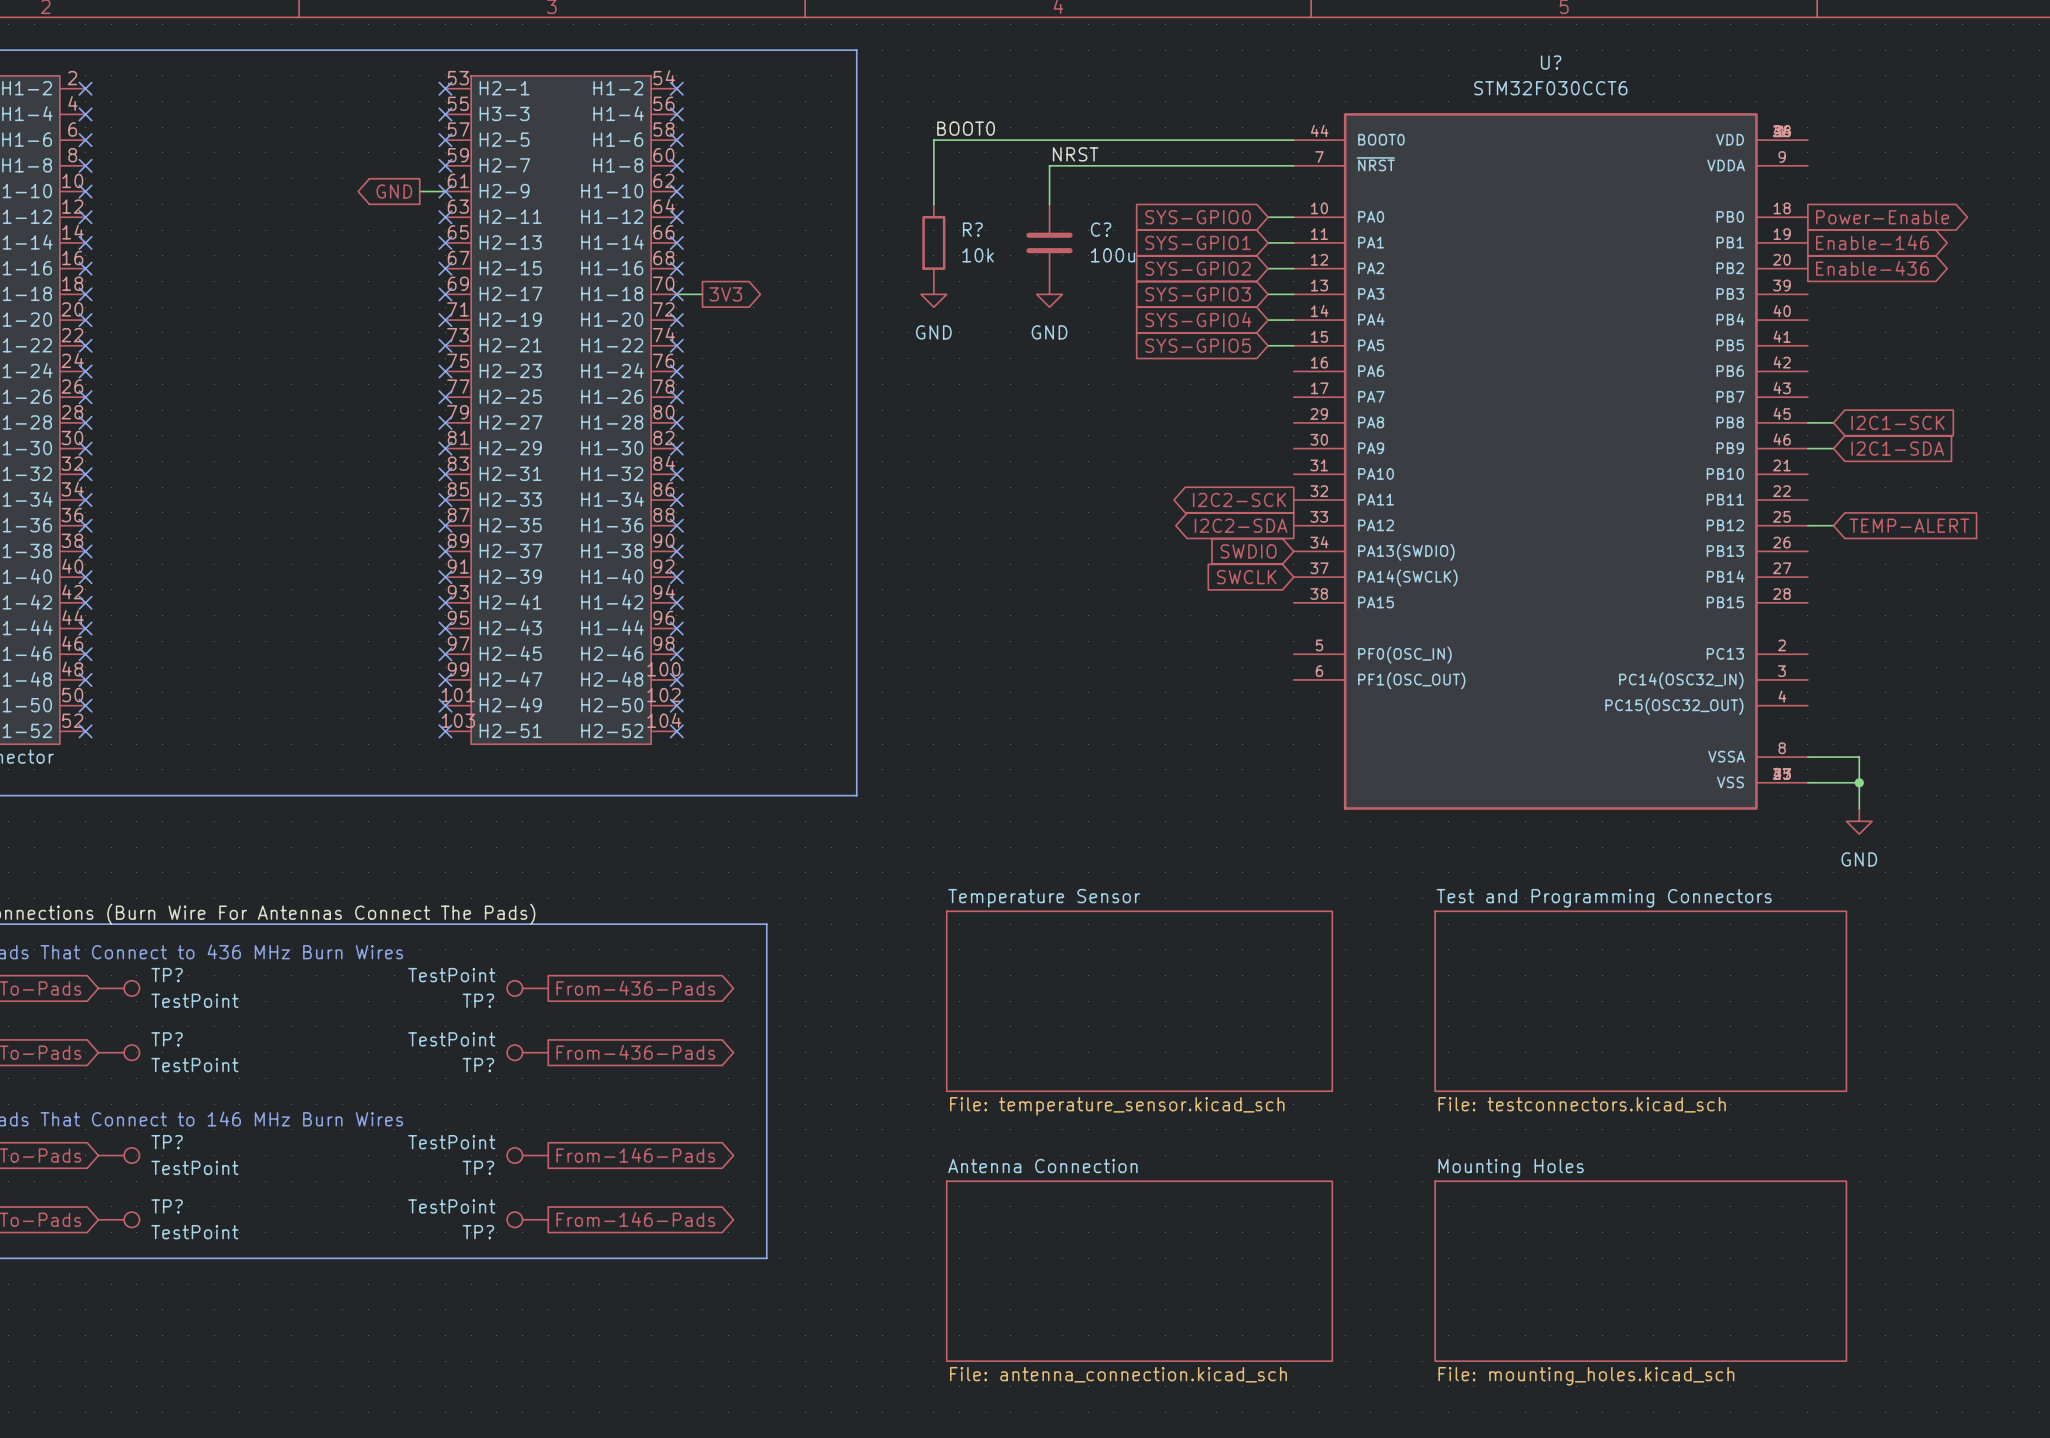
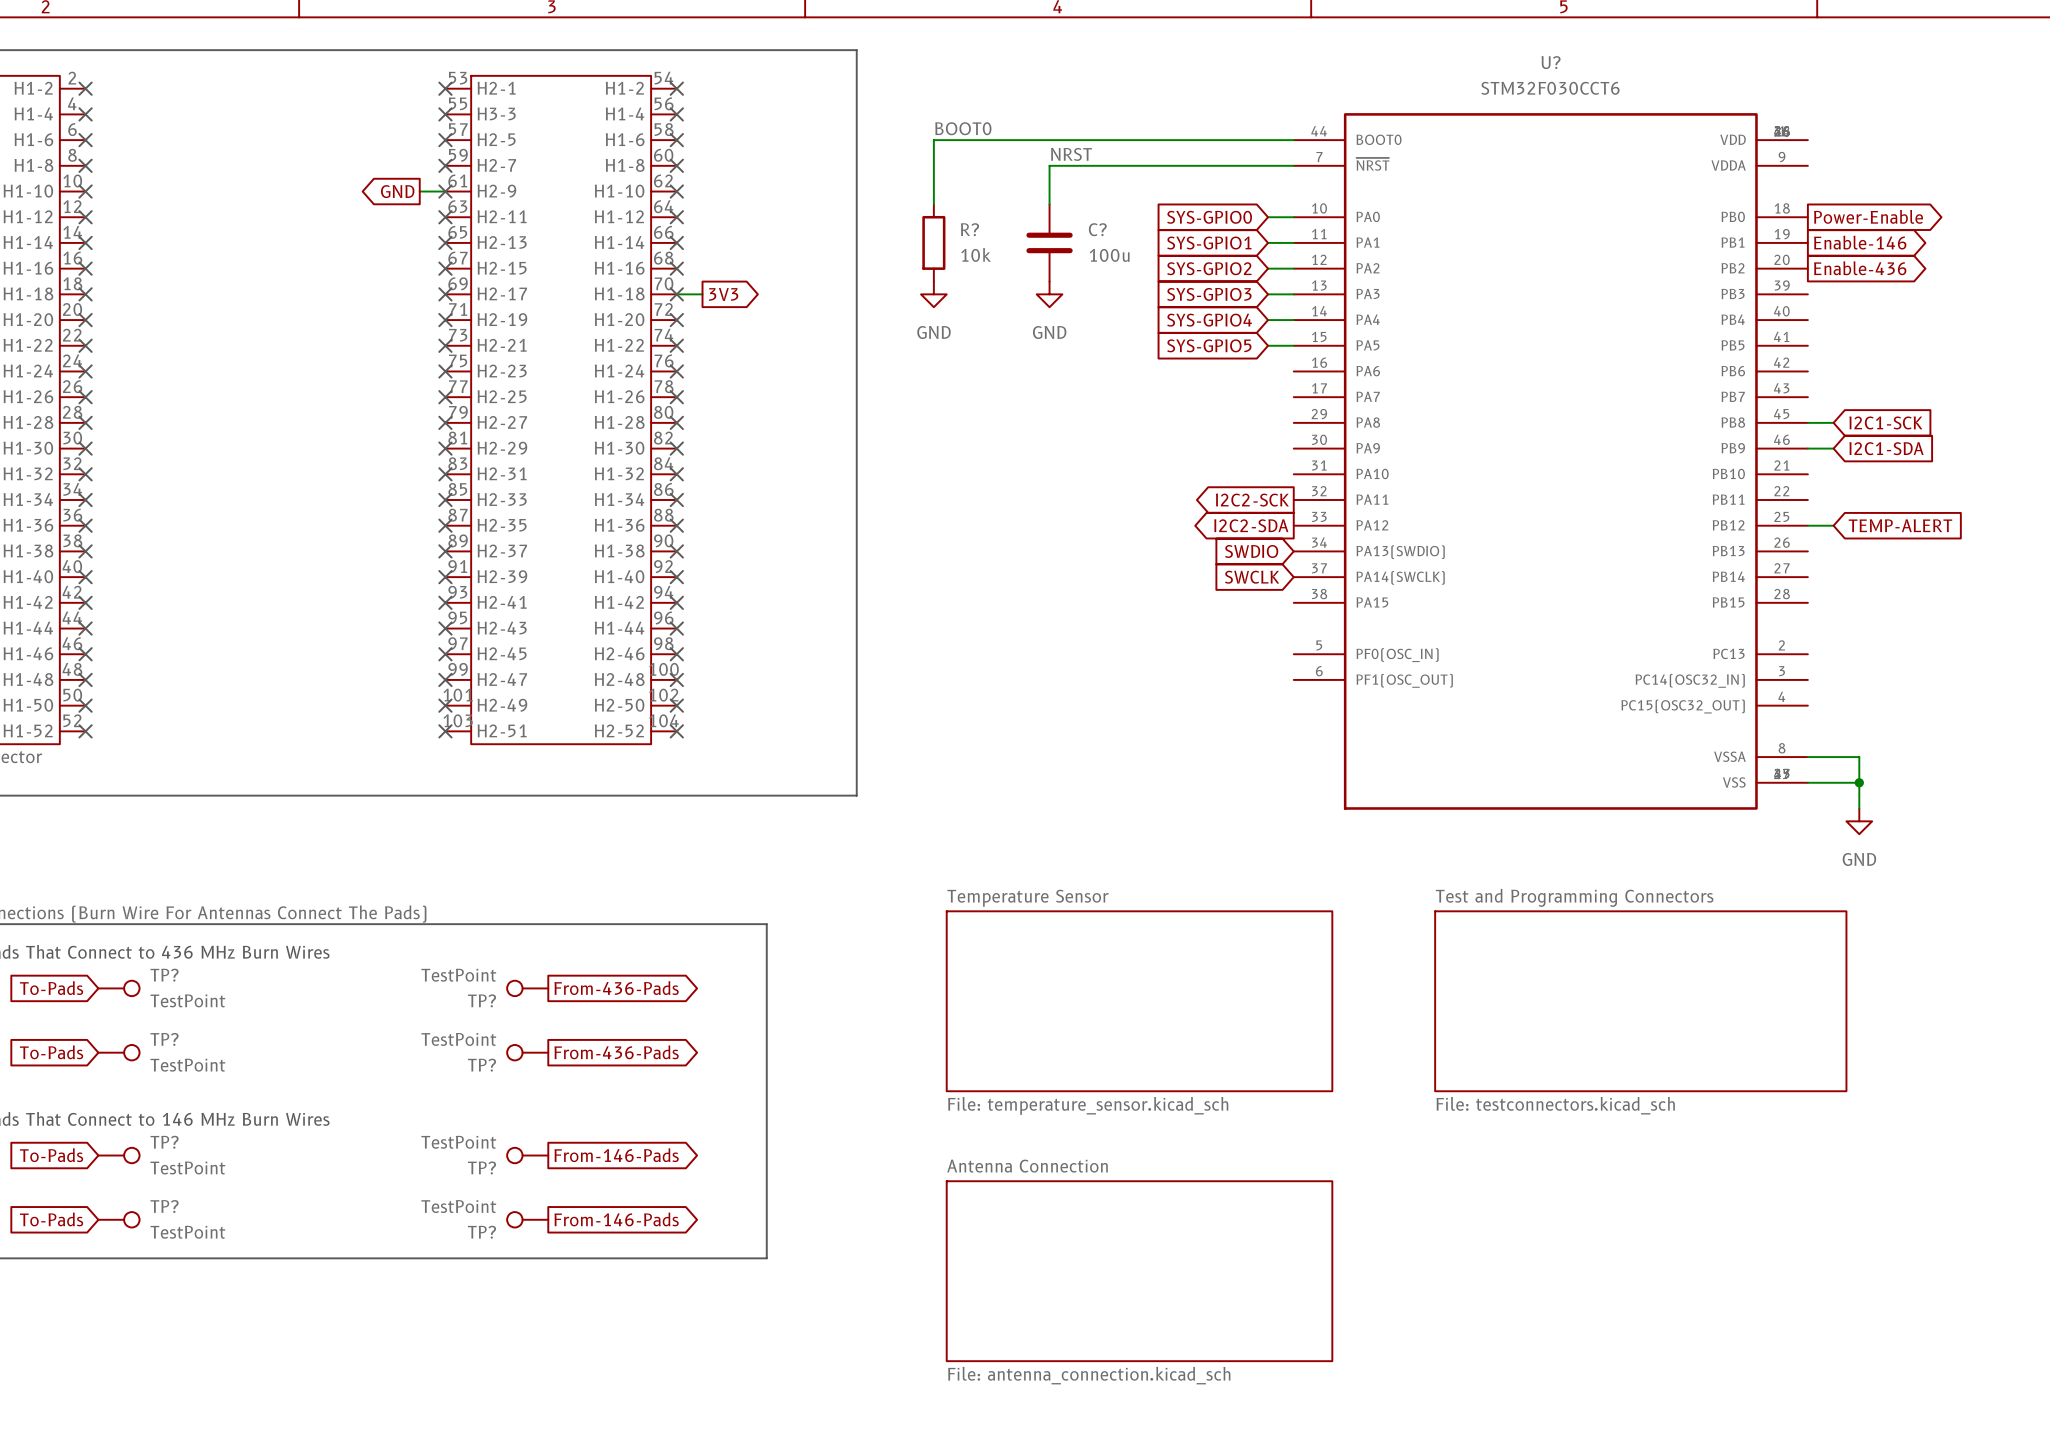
sheet Mounting Holes: File: mounting_holes.kicad_sch (1640, 1271) -> none

